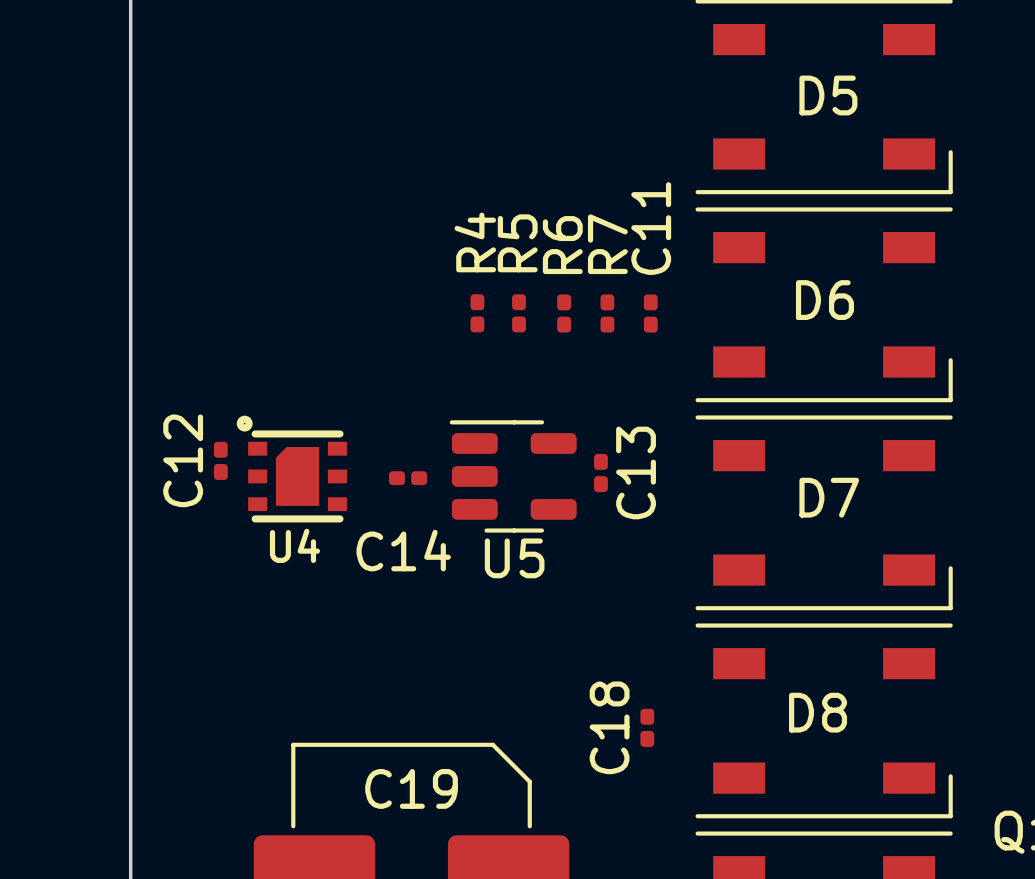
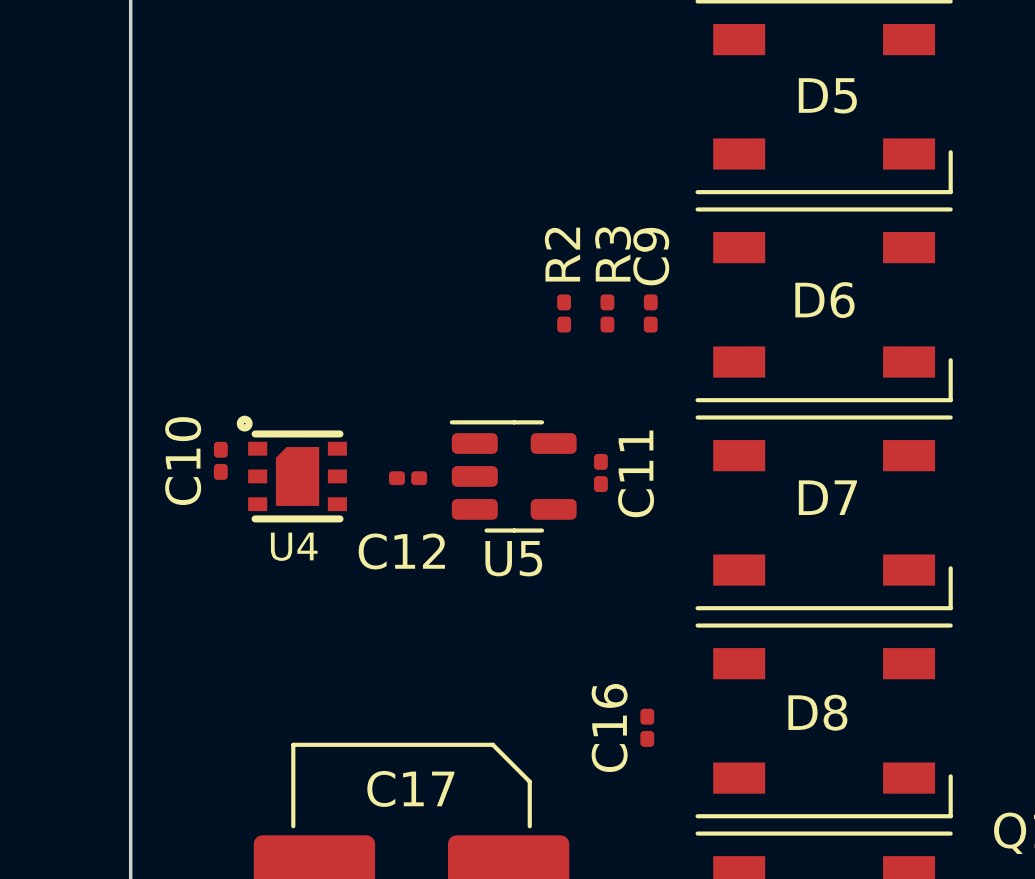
C11 name: C11 (651, 228) -> C9 (651, 256)
R7 name: R7 (607, 244) -> R3 (613, 254)
R6 name: R6 (562, 245) -> R2 (562, 254)
R4: (477, 313) -> none
R5: (519, 313) -> none
C12 name: C12 (183, 460) -> C10 (183, 461)
C13 name: C13 (636, 472) -> C11 (636, 473)
C14 name: C14 (403, 550) -> C12 (401, 551)
C18 name: C18 (609, 727) -> C16 (609, 727)
C19 name: C19 (411, 788) -> C17 (410, 788)

